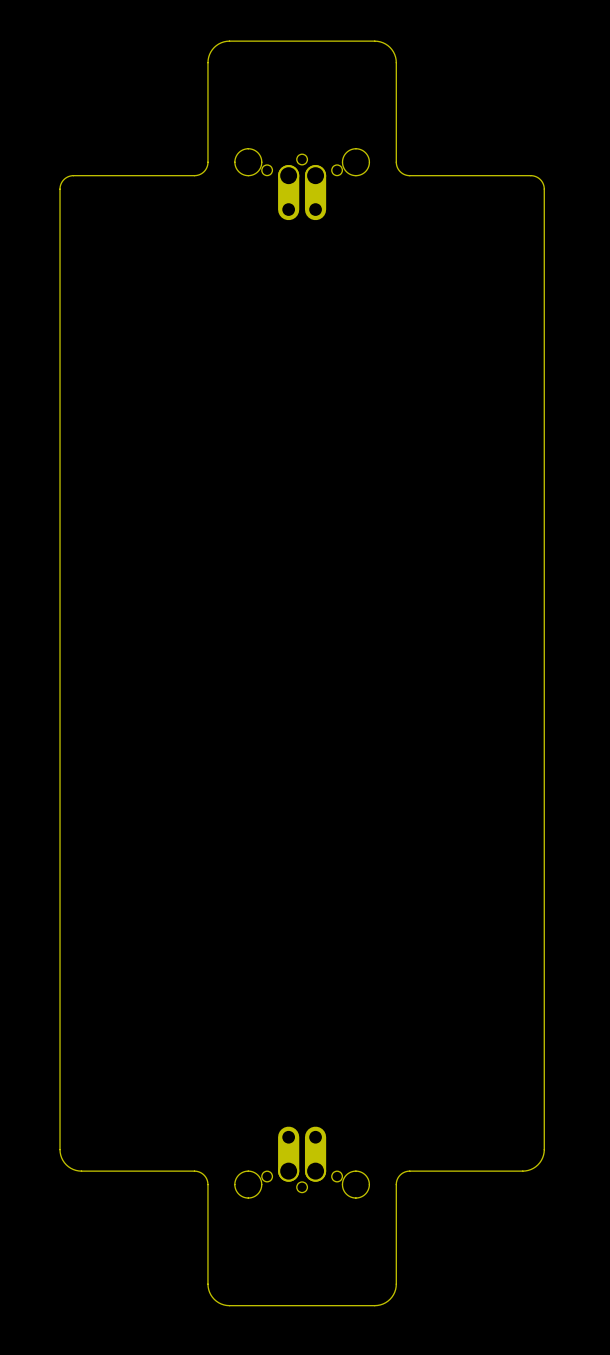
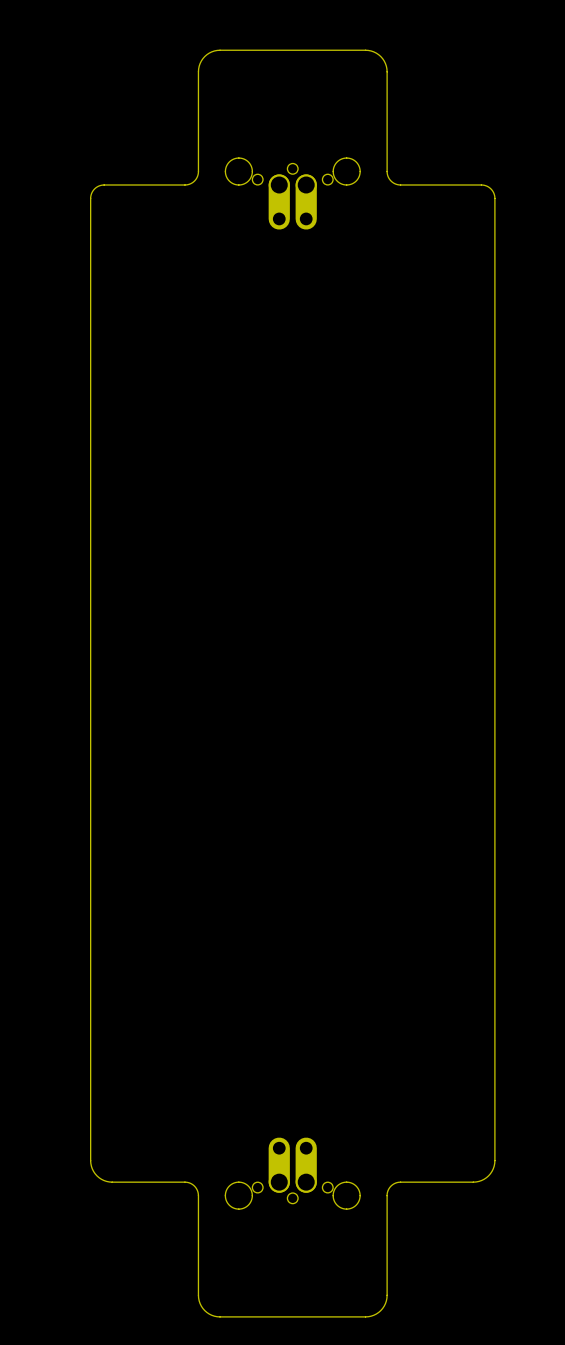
board edge: (113, 175) (70, 176) (62, 180) (60, 189) (60, 1149) (64, 1162) (73, 1169) (121, 1171) -> (104, 185) (94, 188) (90, 198) (90, 1160) (92, 1168) (96, 1175) (103, 1180) (112, 1182)
board edge: (490, 175) (533, 176) (541, 180) (544, 189) (544, 1149) (541, 1160) (531, 1169) (482, 1171) -> (481, 185) (490, 188) (494, 198) (494, 1160) (493, 1168) (488, 1175) (481, 1180) (473, 1182)

